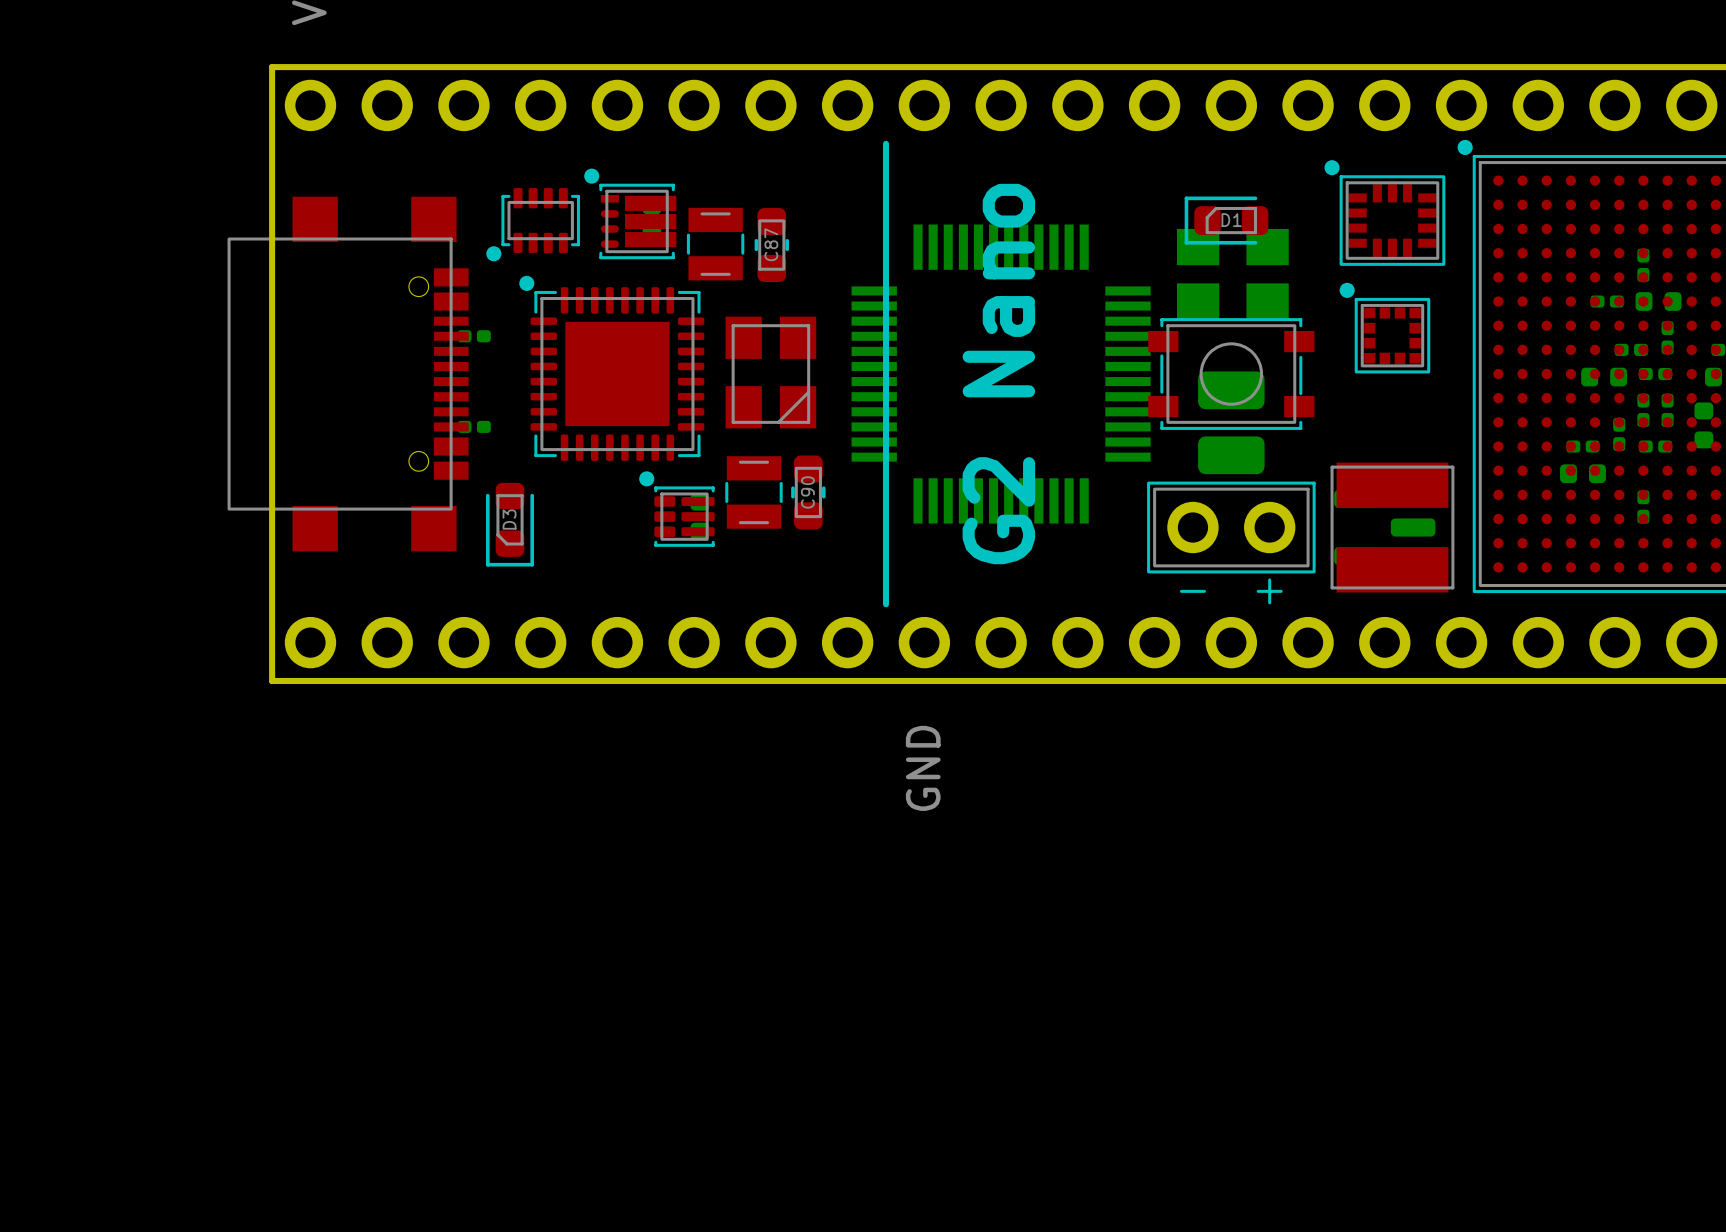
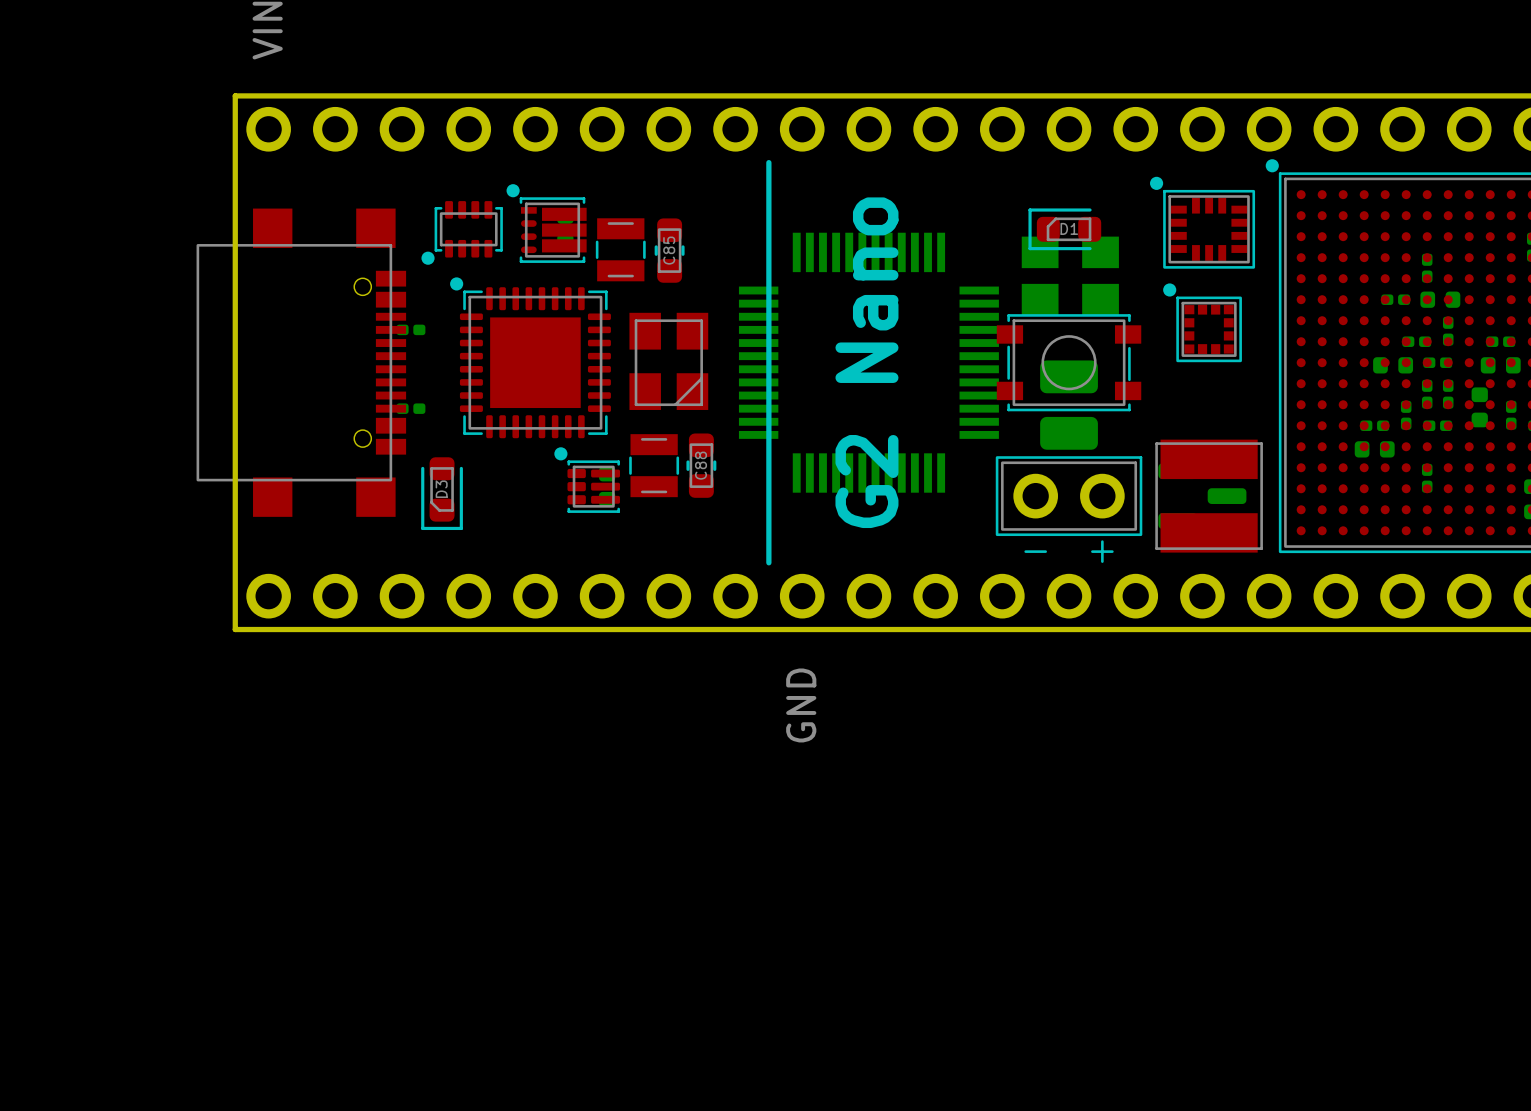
C87 name: C87 (771, 244) -> C85 (669, 250)
C90 name: C90 (807, 492) -> C88 (701, 465)

